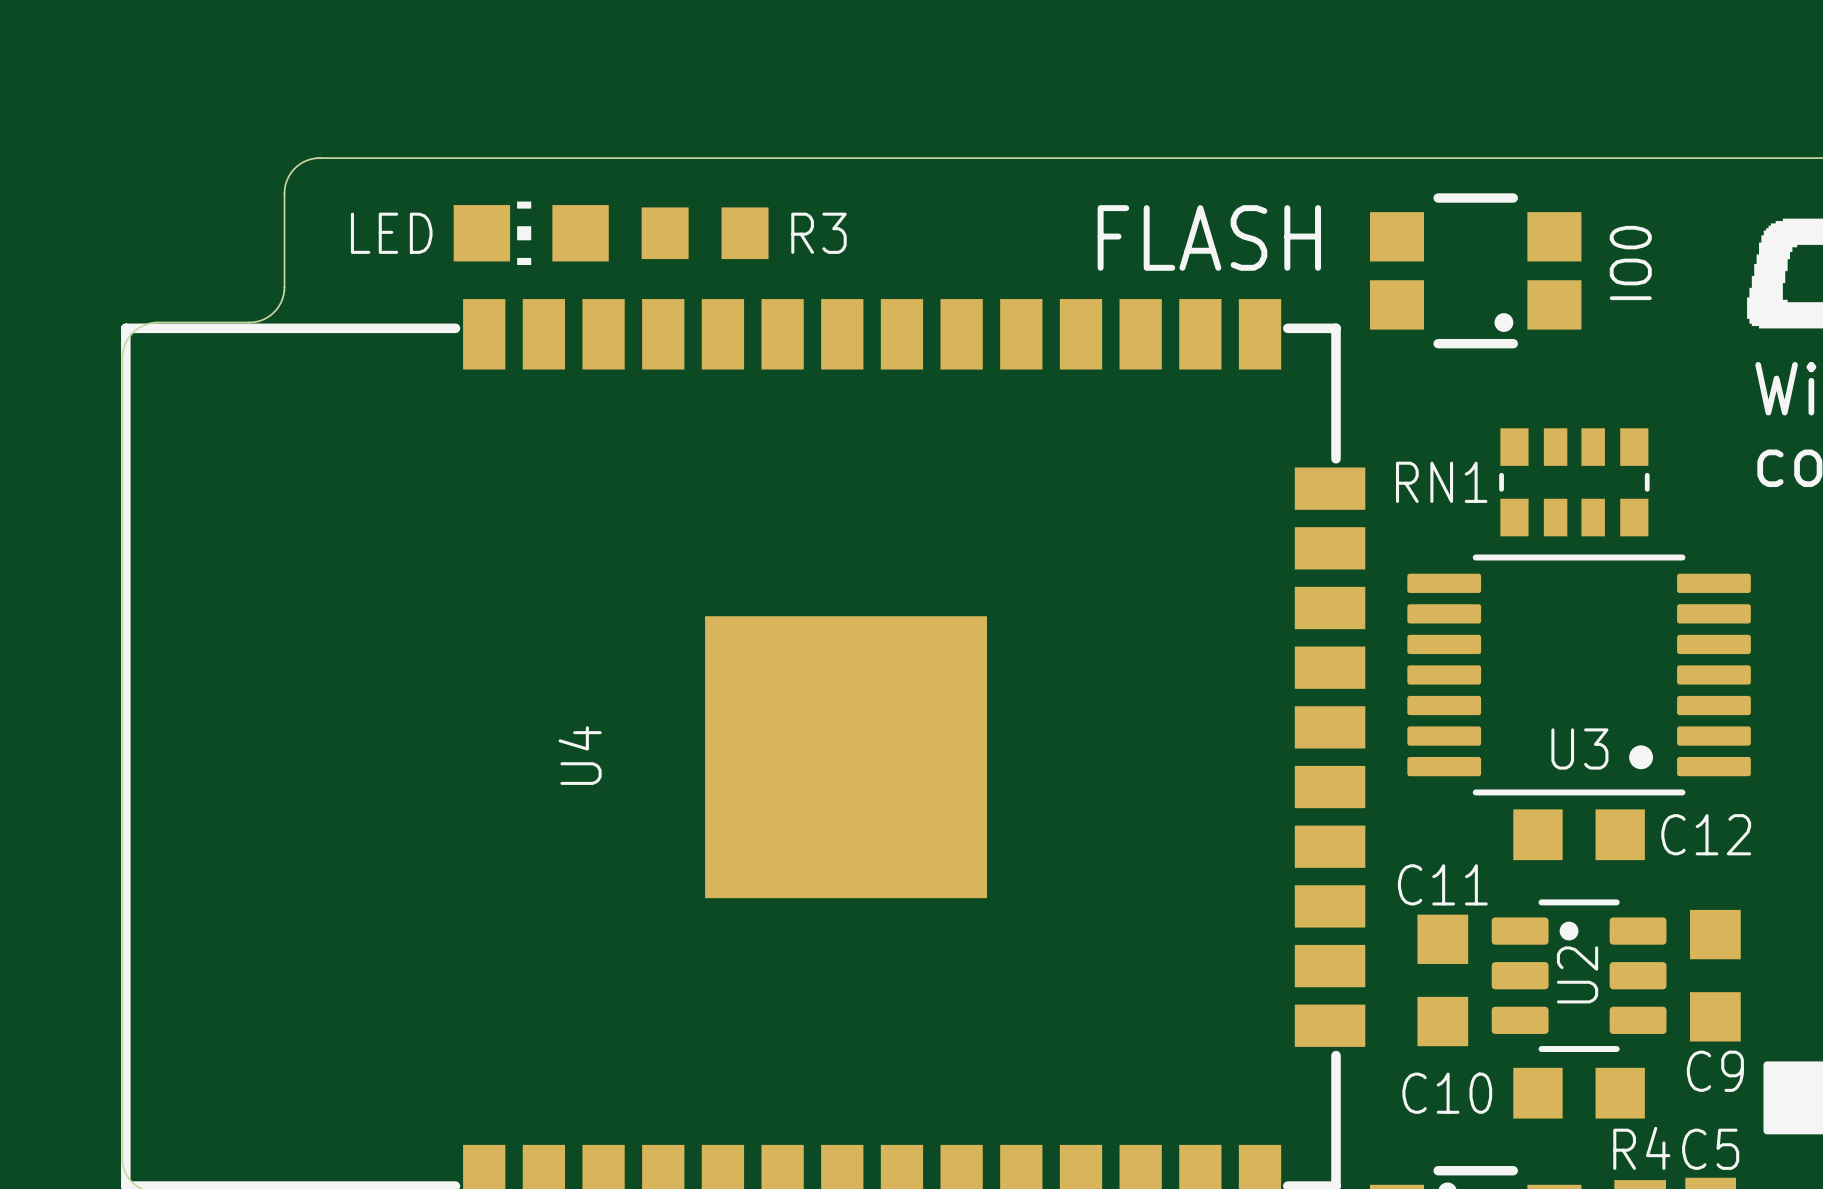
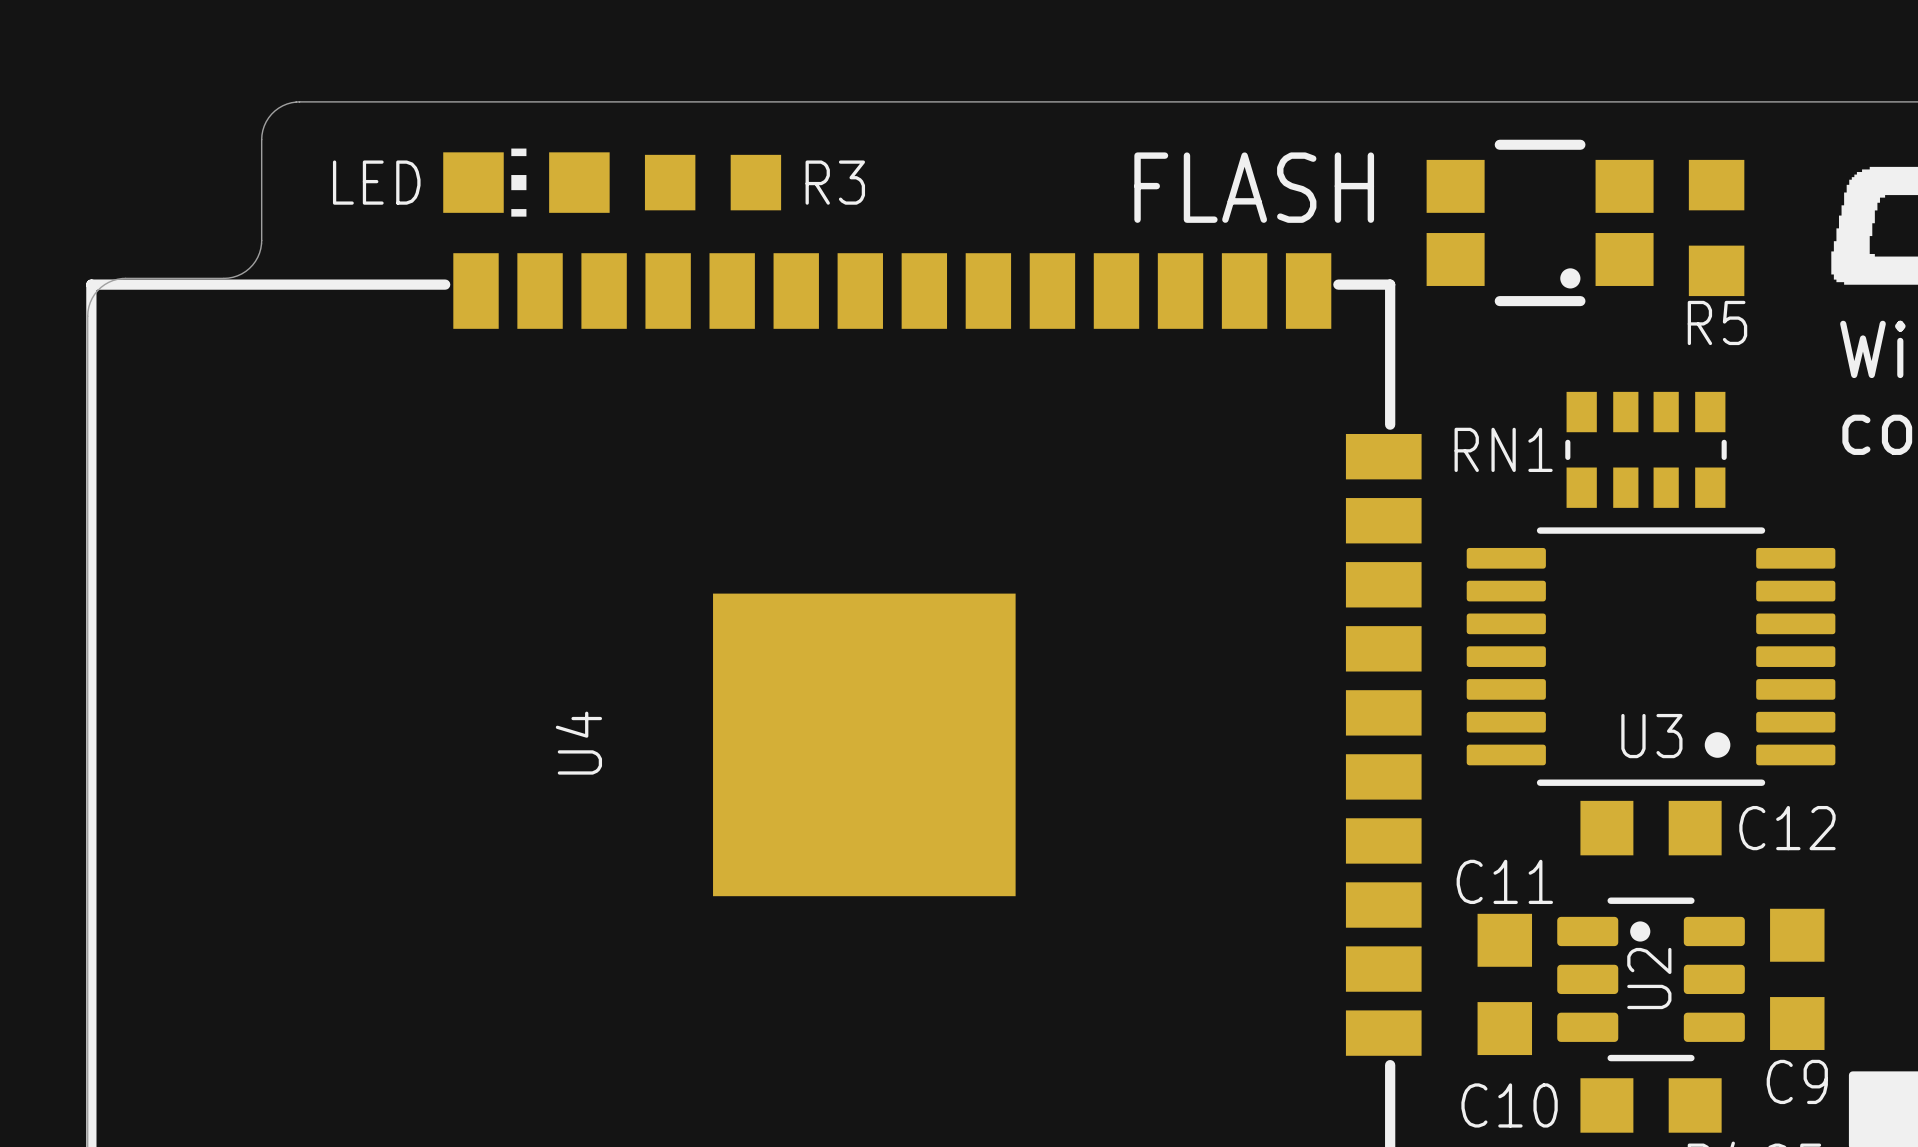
text: IO0 (1630, 262) -> none
R5: none -> (1716, 227)

